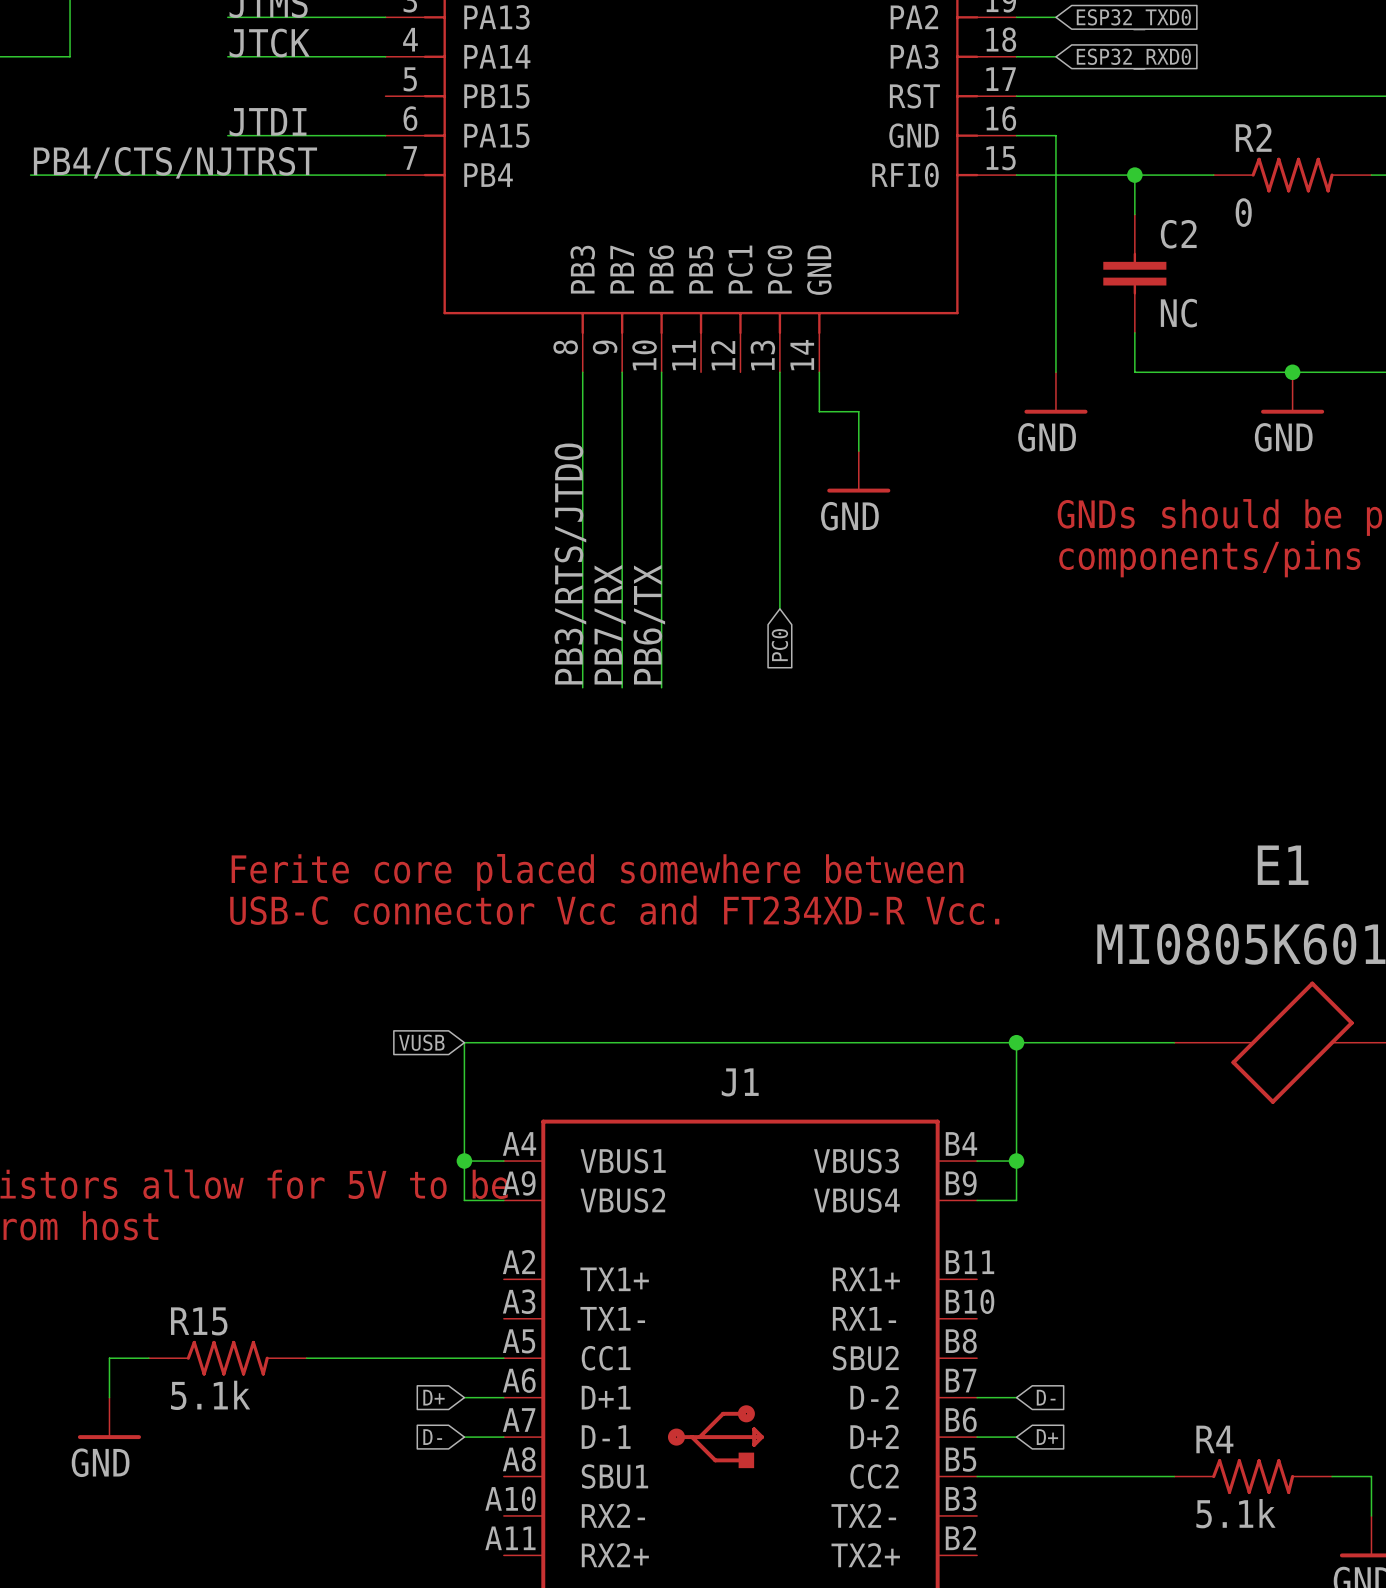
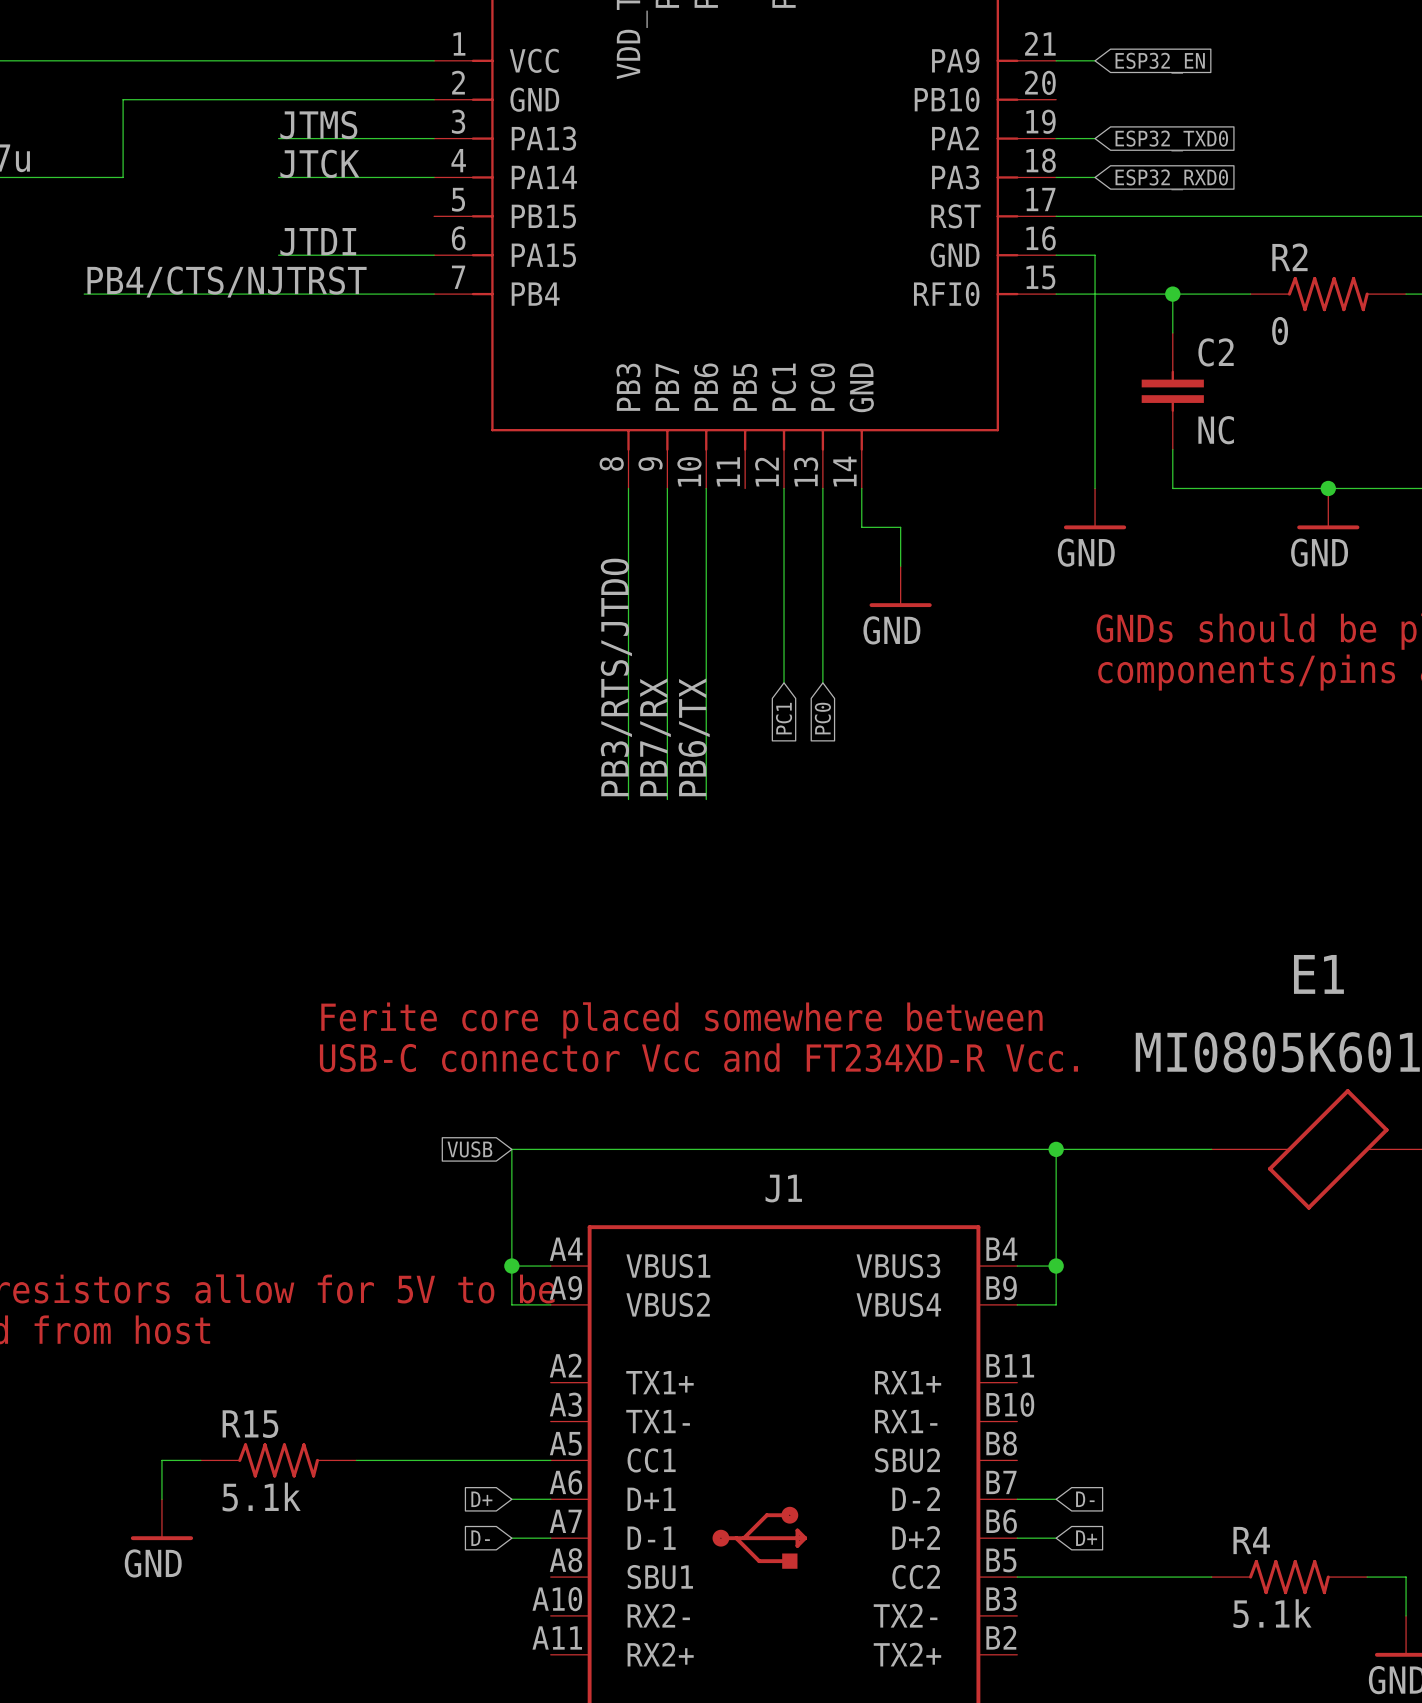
wire: none -> (784, 488) (784, 682)
wire: (779, 569) (779, 608) -> none
global label: none -> PC1 (784, 718)
global label position: PC0 (779, 645) -> PC0 (822, 718)
text position: Ferite core placed somewhere between (597, 872) -> Ferite core placed somewhere between (681, 1020)
text position: USB-C connector Vcc and FT234XD-R Vcc. (614, 910) -> USB-C connector Vcc and FT234XD-R Vcc. (698, 1057)

